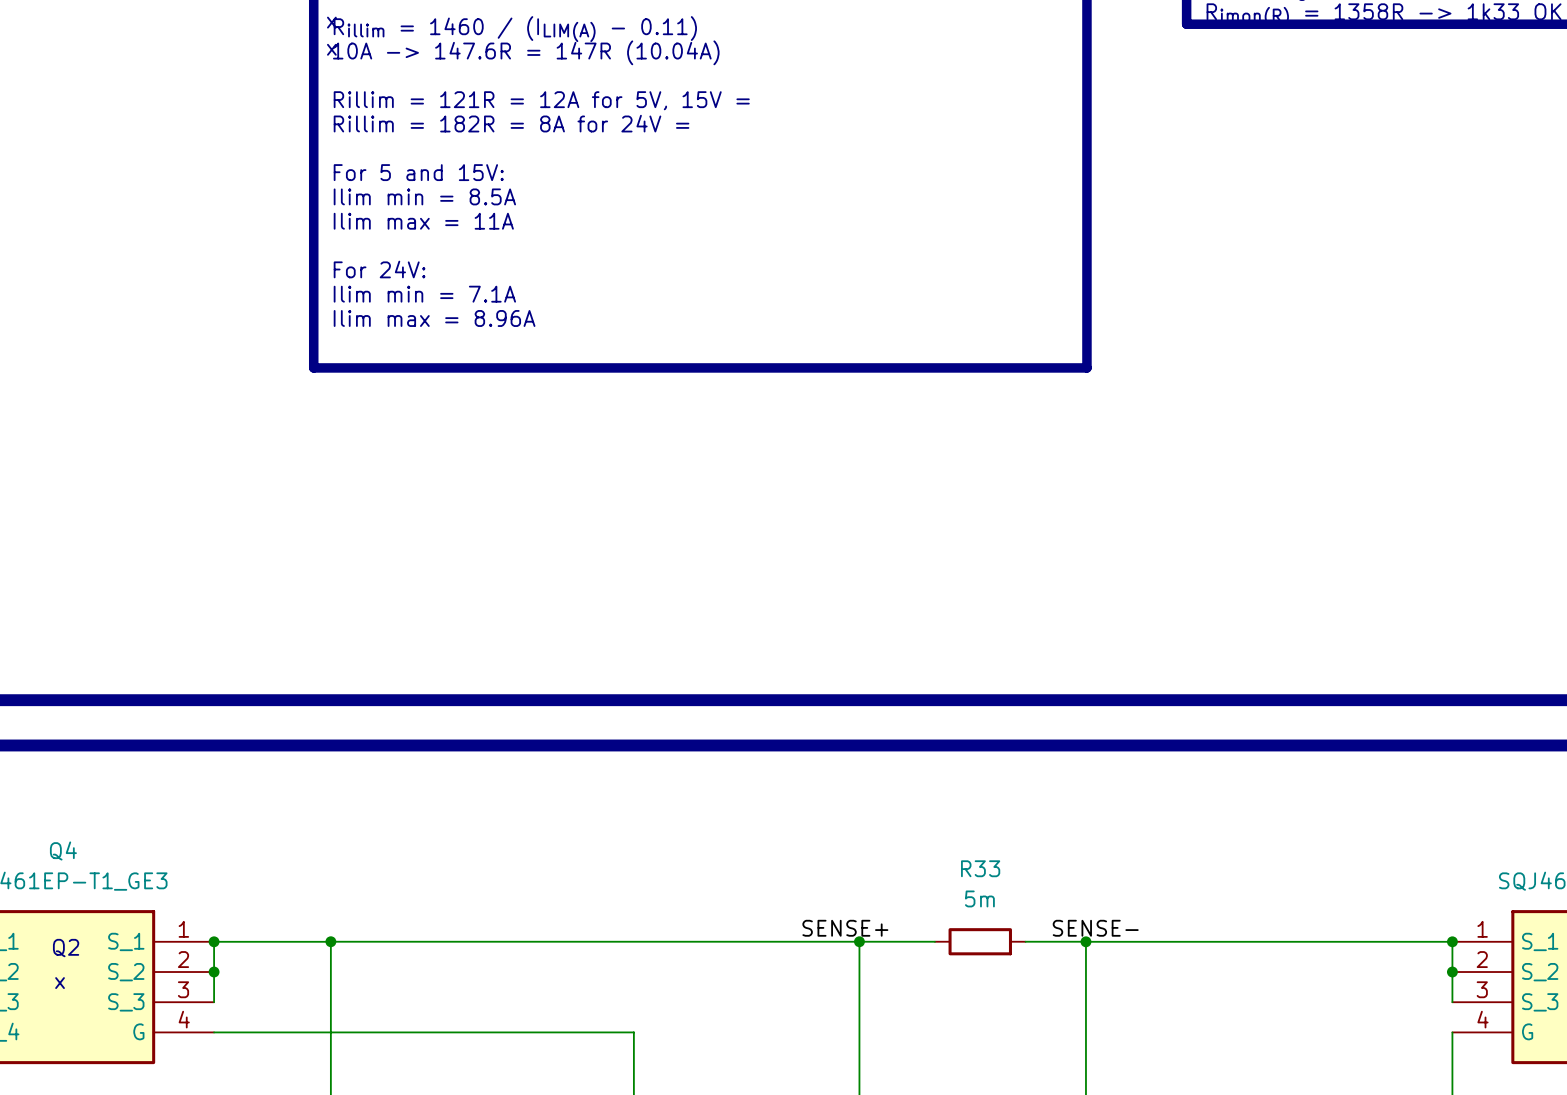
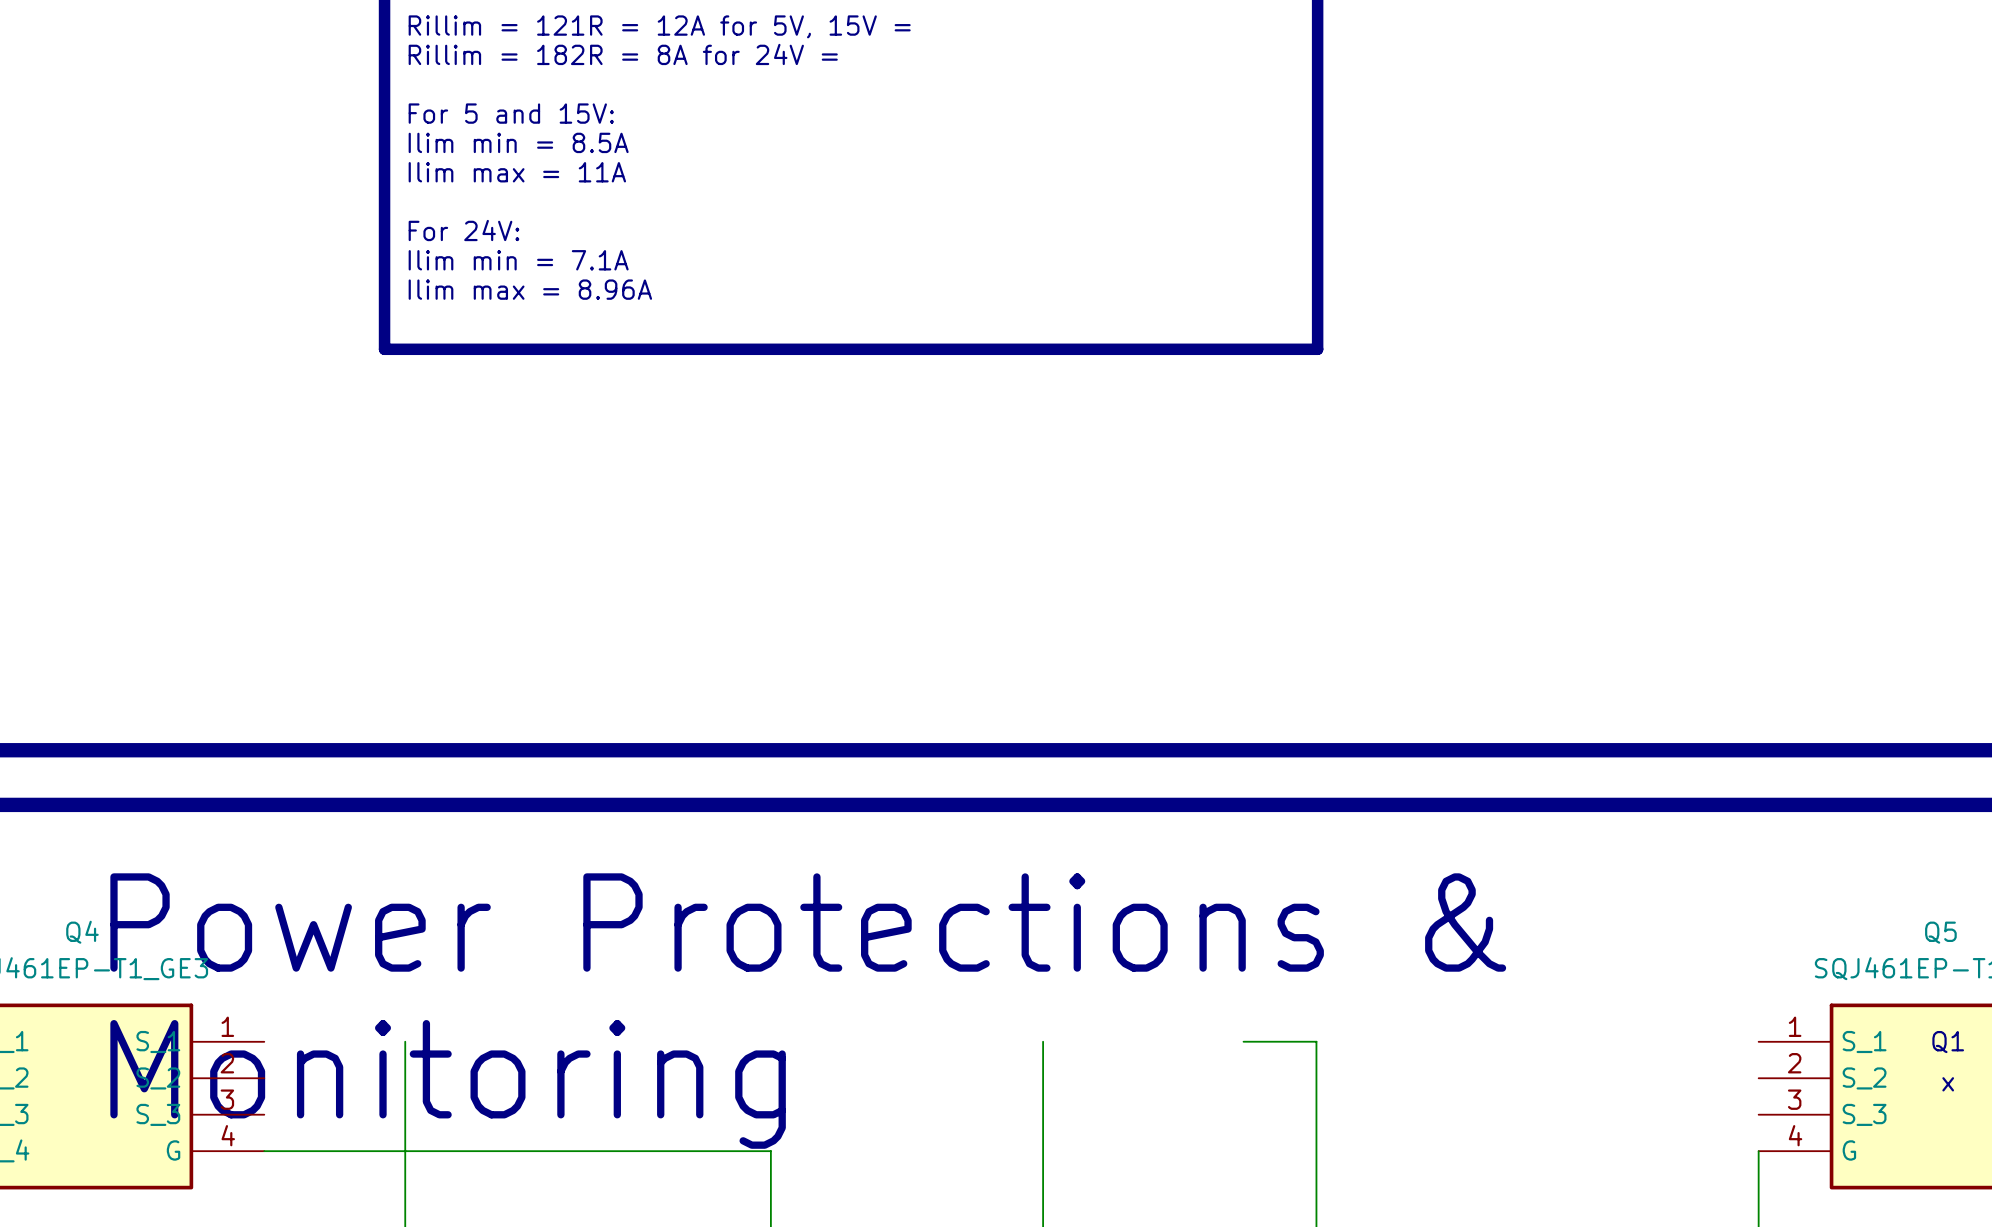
text: none -> Power Protections & (808, 922)
label: SENSE+ (845, 928) -> none
label: SENSE- (1095, 928) -> none
junction: (214, 941) -> none
junction: (330, 941) -> none
junction: (859, 941) -> none
wire: (934, 941) (214, 941) (214, 1002) -> none
R33: 5m (980, 941) -> none
wire: (1085, 941) (1452, 941) (1452, 1002) -> none
junction: (1085, 941) -> none
junction: (1452, 941) -> none
text: Q2 (66, 948) -> none
junction: (214, 972) -> none
junction: (1452, 972) -> none
text: none -> Monitoring (448, 1084)
text: x (60, 983) -> none

